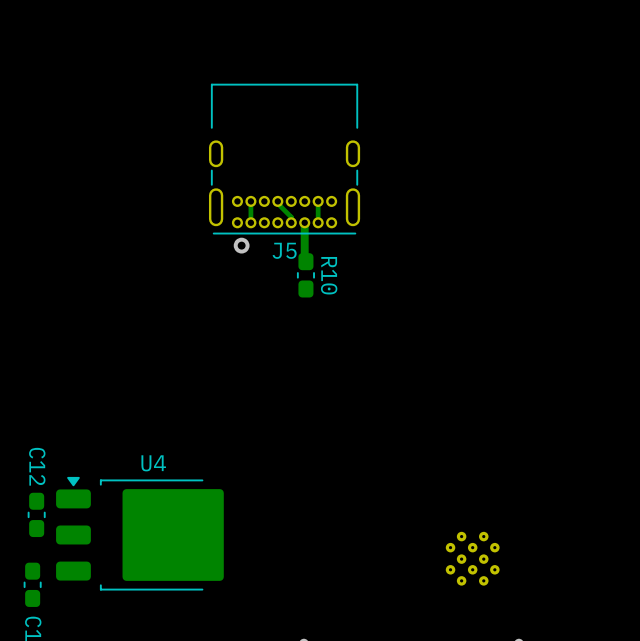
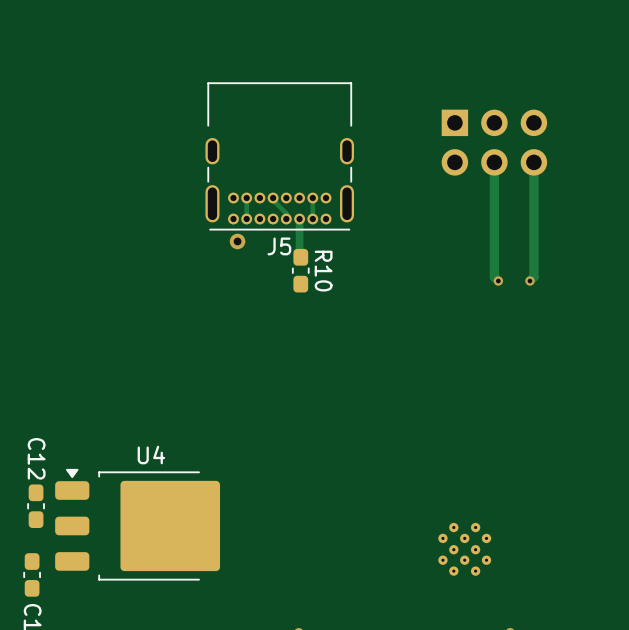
part: none -> (494, 142)
track: none -> (494, 162) (494, 277) (498, 280)
track: none -> (533, 162) (533, 277) (529, 280)
via: none -> (498, 280)
via: none -> (529, 280)

